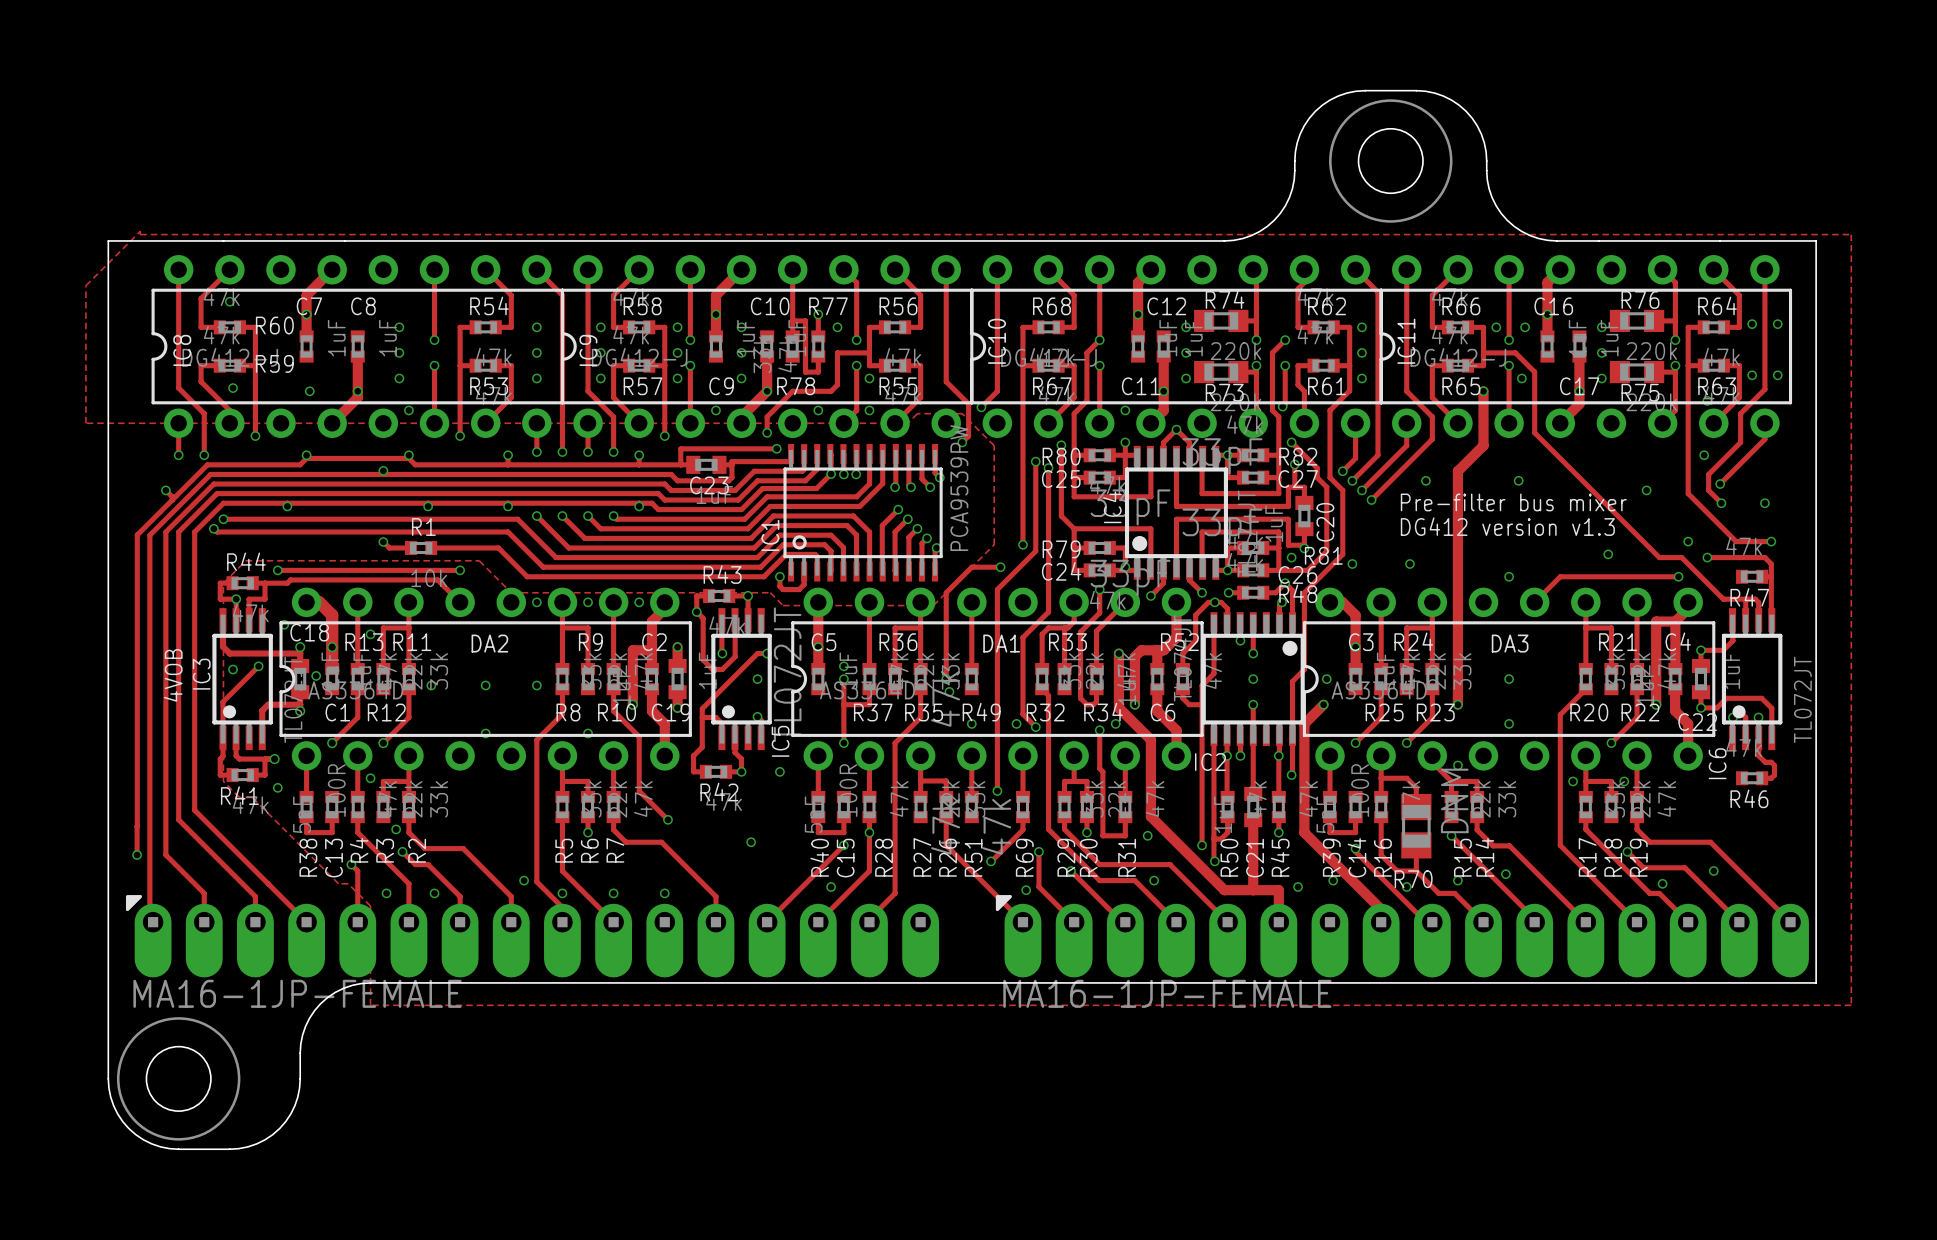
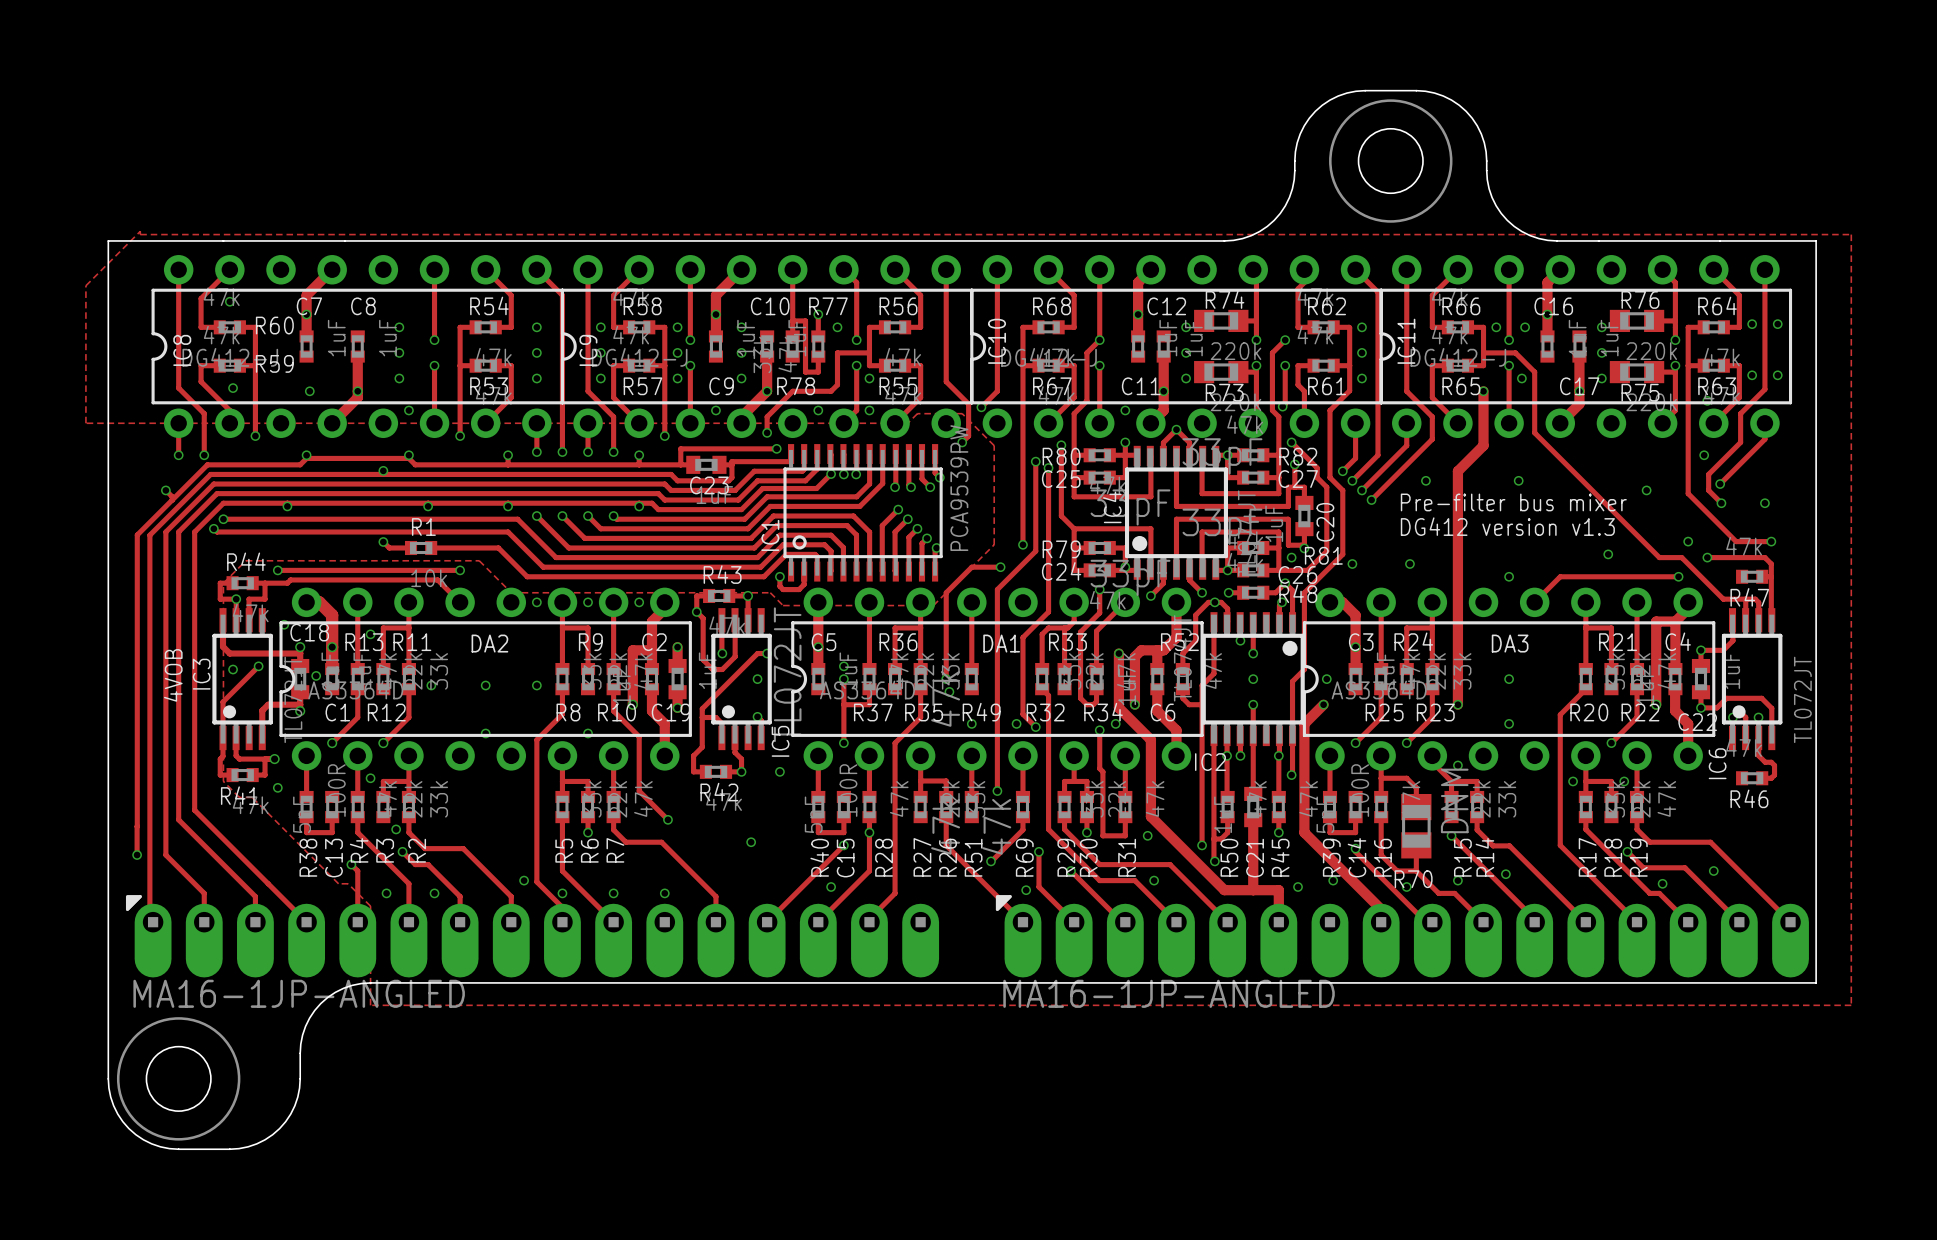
part value: MA16-1JP-FEMALE (297, 993) -> MA16-1JP-ANGLED (299, 993)
part value: MA16-1JP-FEMALE (1167, 993) -> MA16-1JP-ANGLED (1169, 993)

